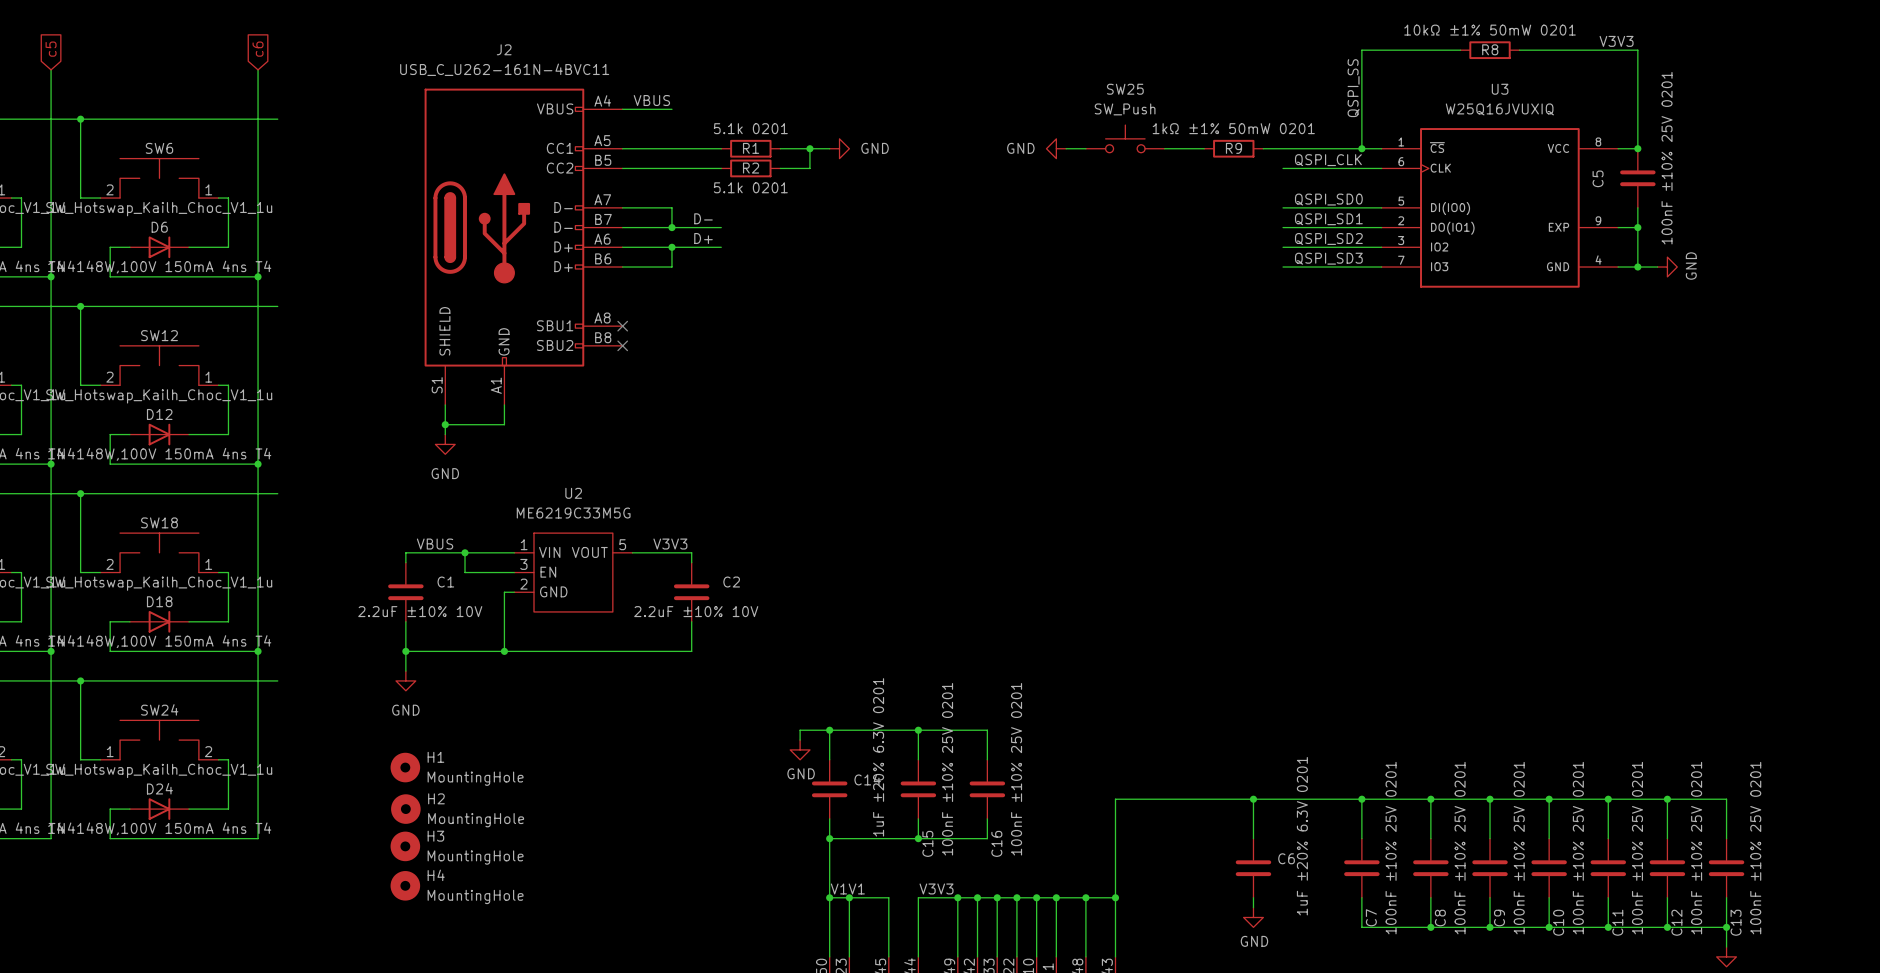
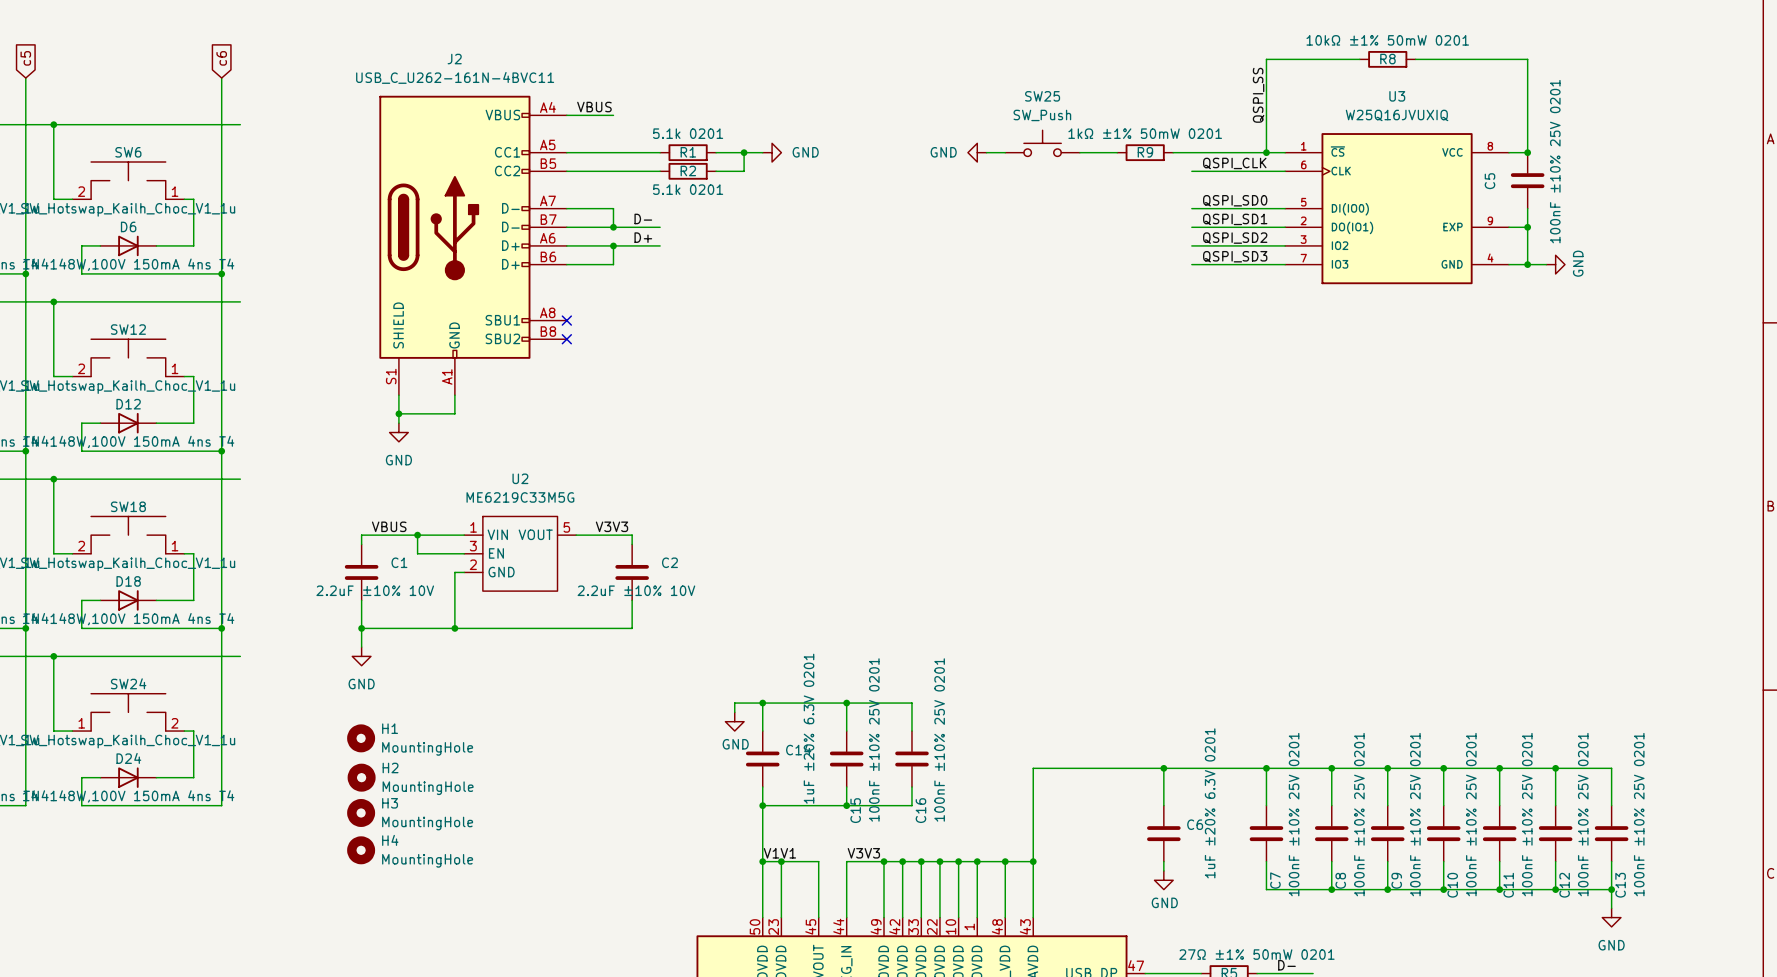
label: V3V3 (1616, 41) -> none

